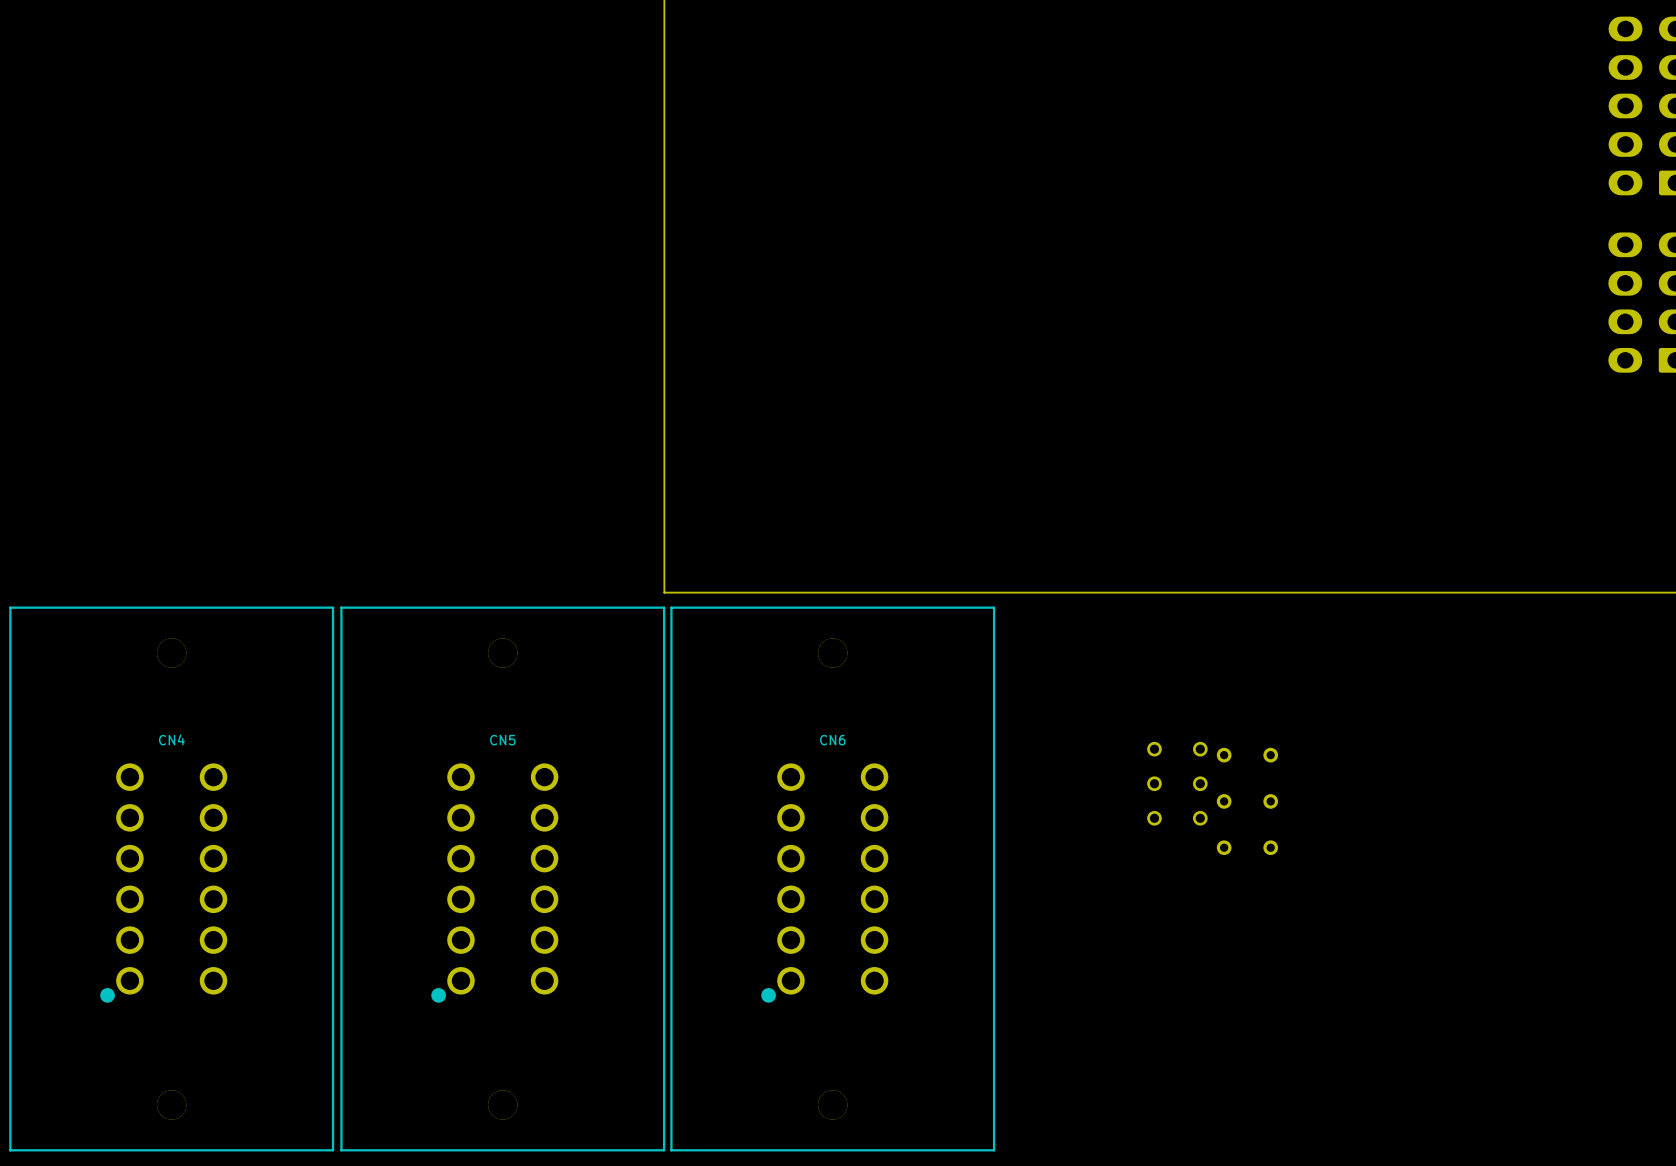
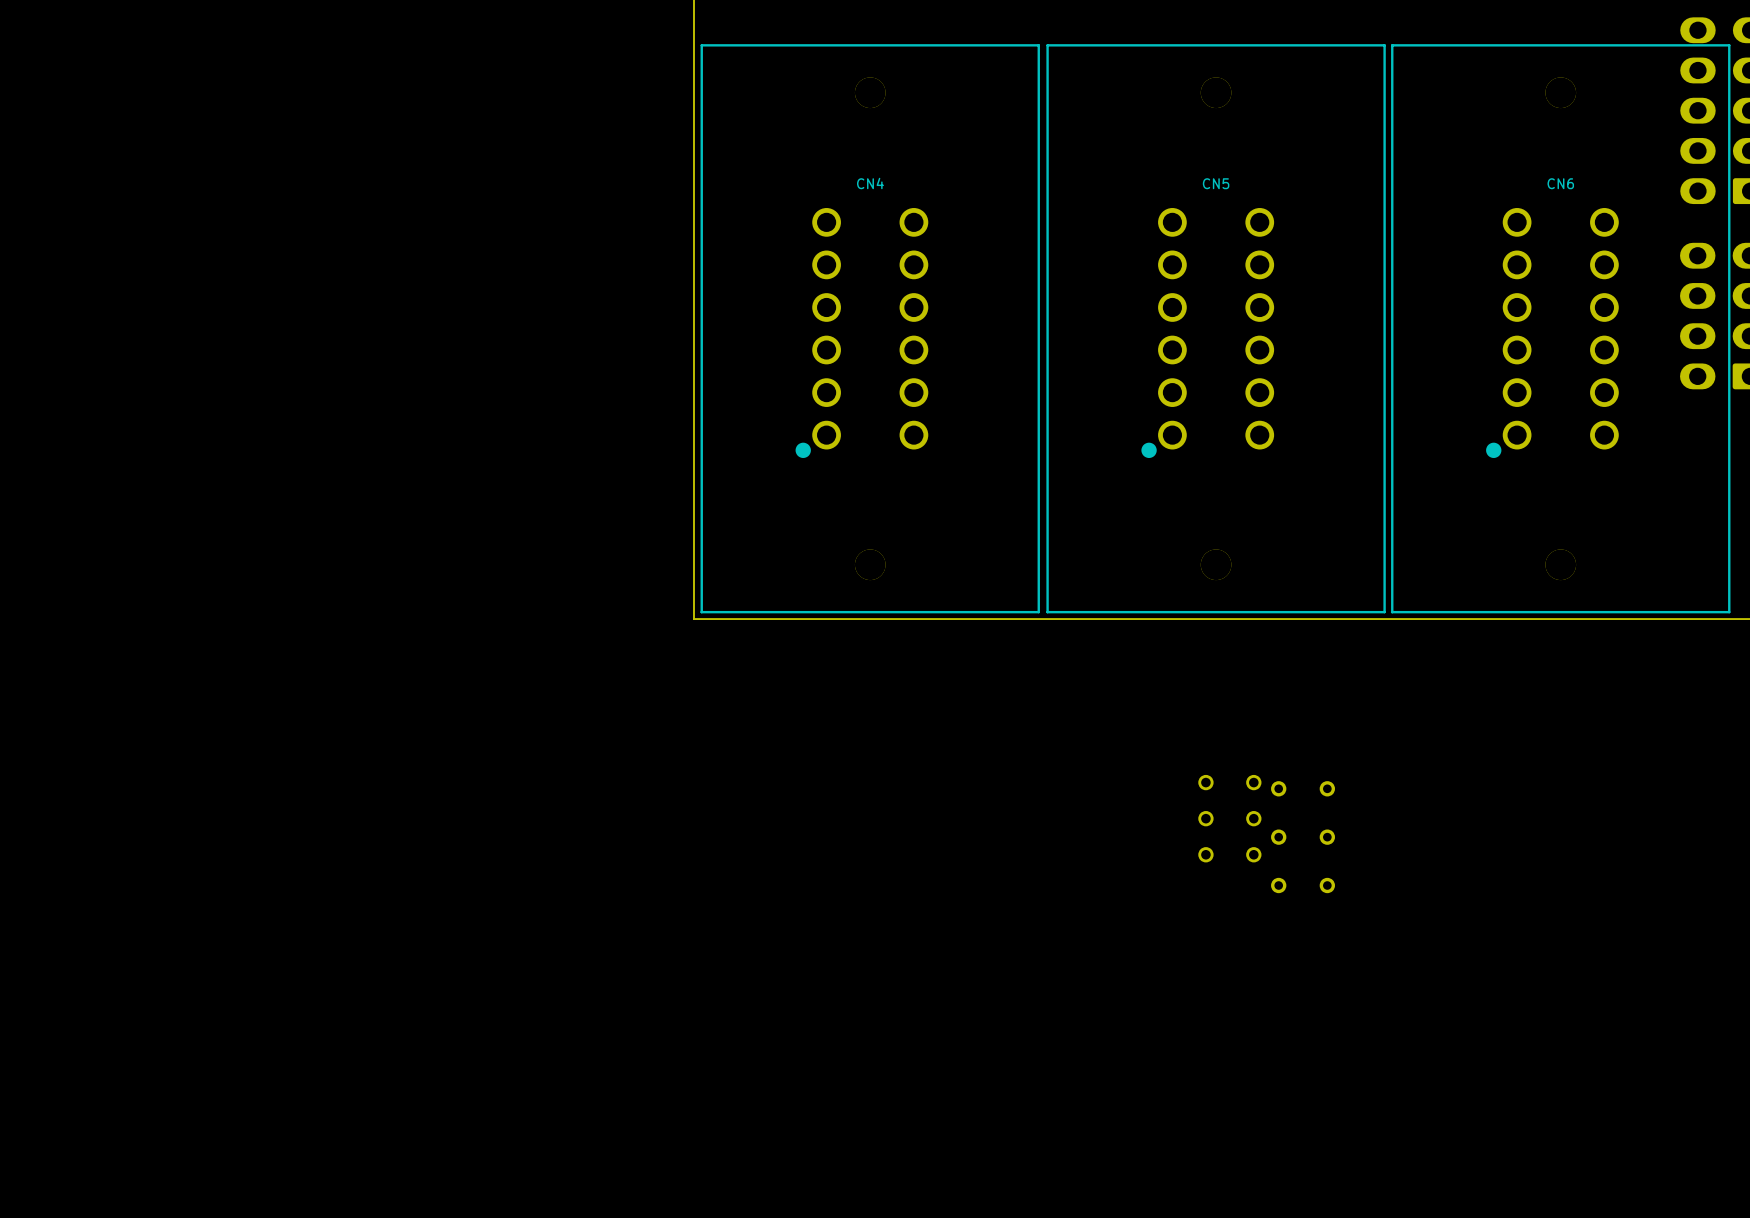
CN4 position: (171, 878) -> (870, 328)
CN5 position: (502, 878) -> (1216, 328)
CN6 position: (832, 878) -> (1560, 328)

